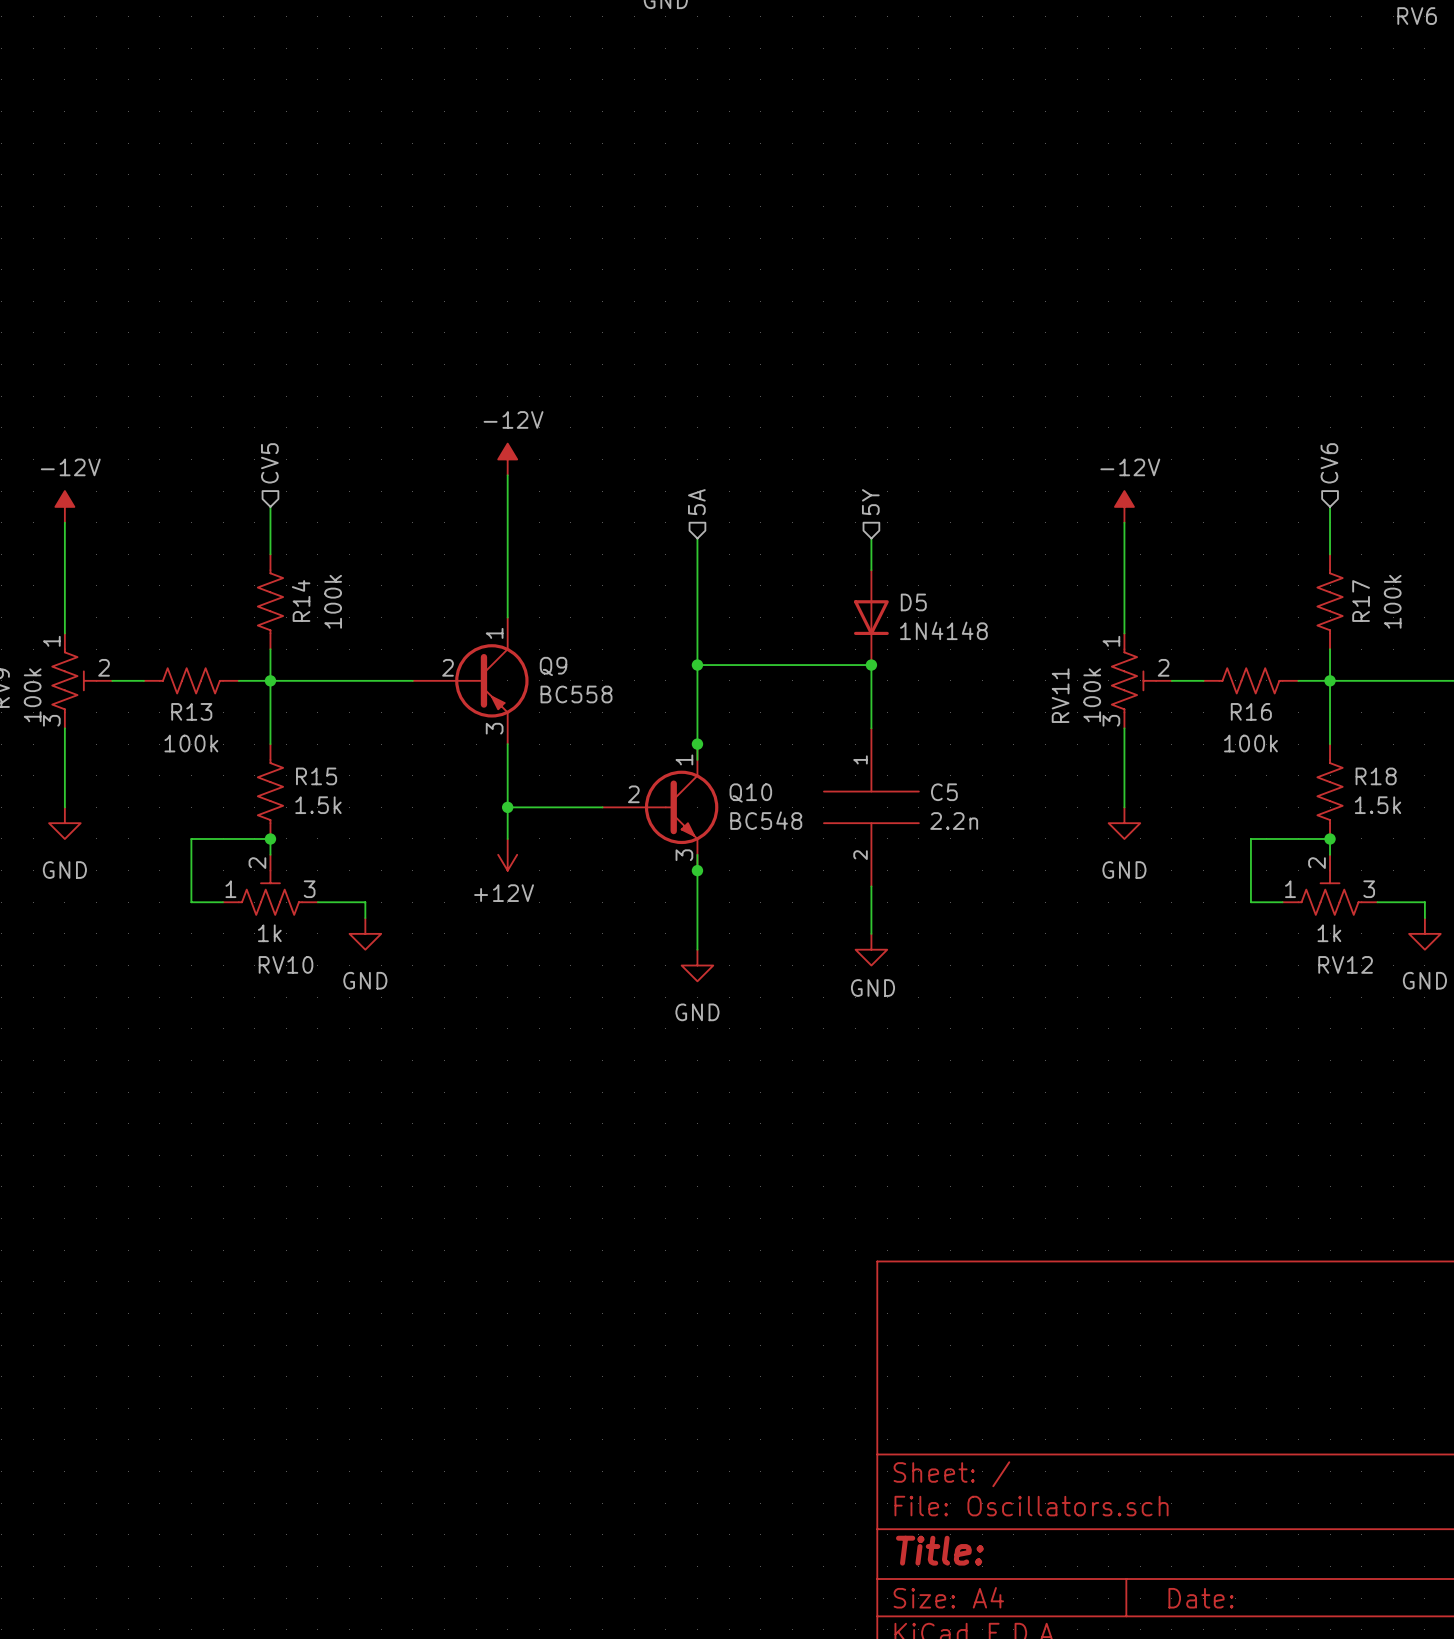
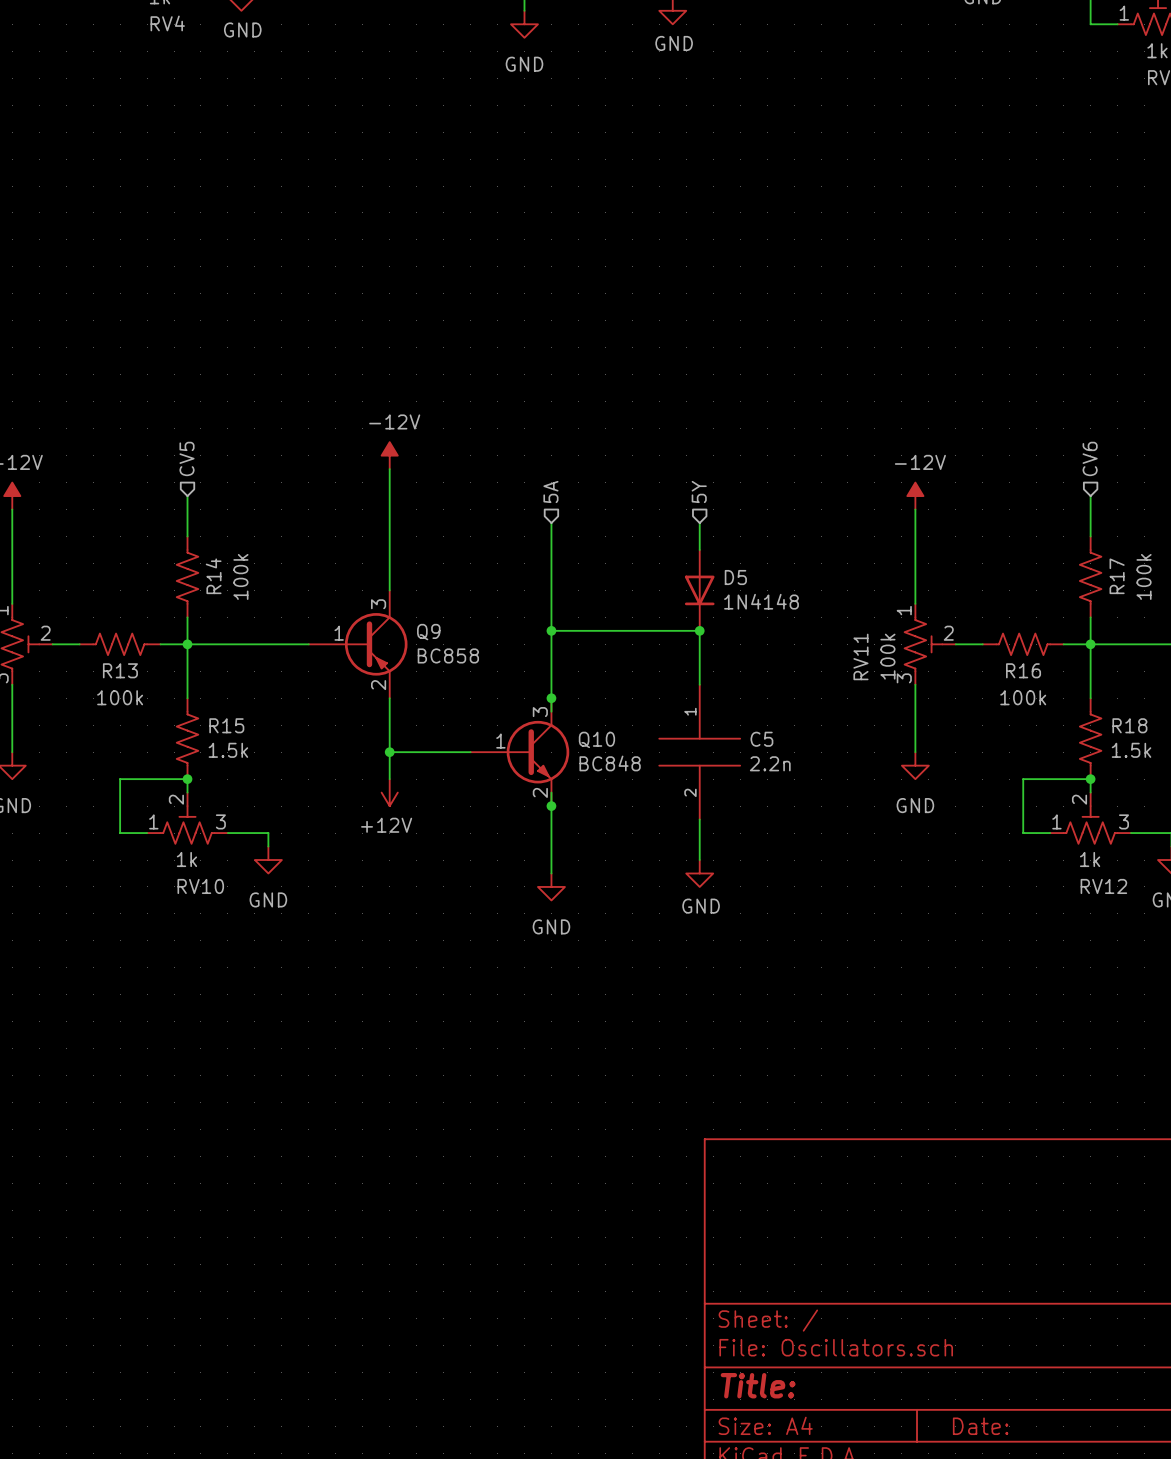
Q9 pin number: 1 (494, 633) -> 3 (378, 604)
Q9 pin number: 2 (448, 667) -> 1 (339, 633)
Q9 value: BC558 (576, 694) -> BC858 (448, 655)
Q9 pin number: 3 (494, 728) -> 2 (378, 685)
Q10 symbol: [602, 744, 719, 871] -> [470, 698, 570, 807]
Q10 value: BC548 (766, 820) -> BC848 (610, 763)

